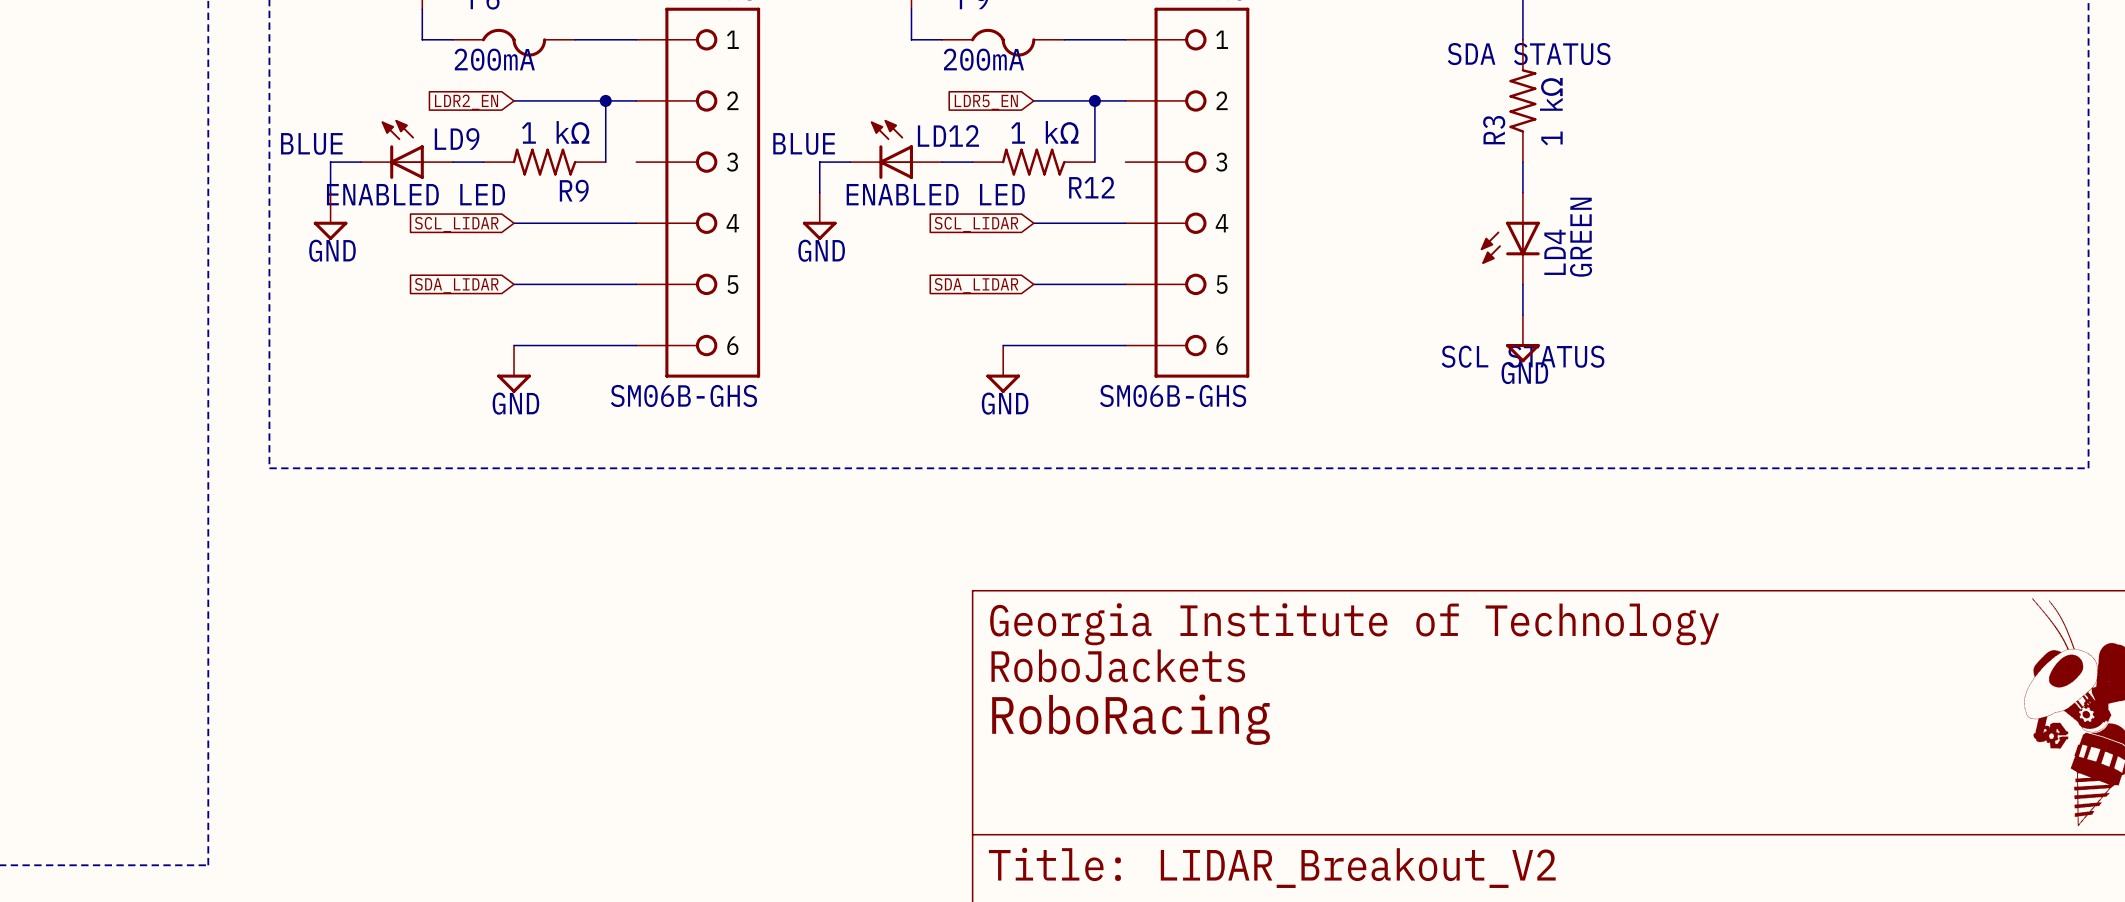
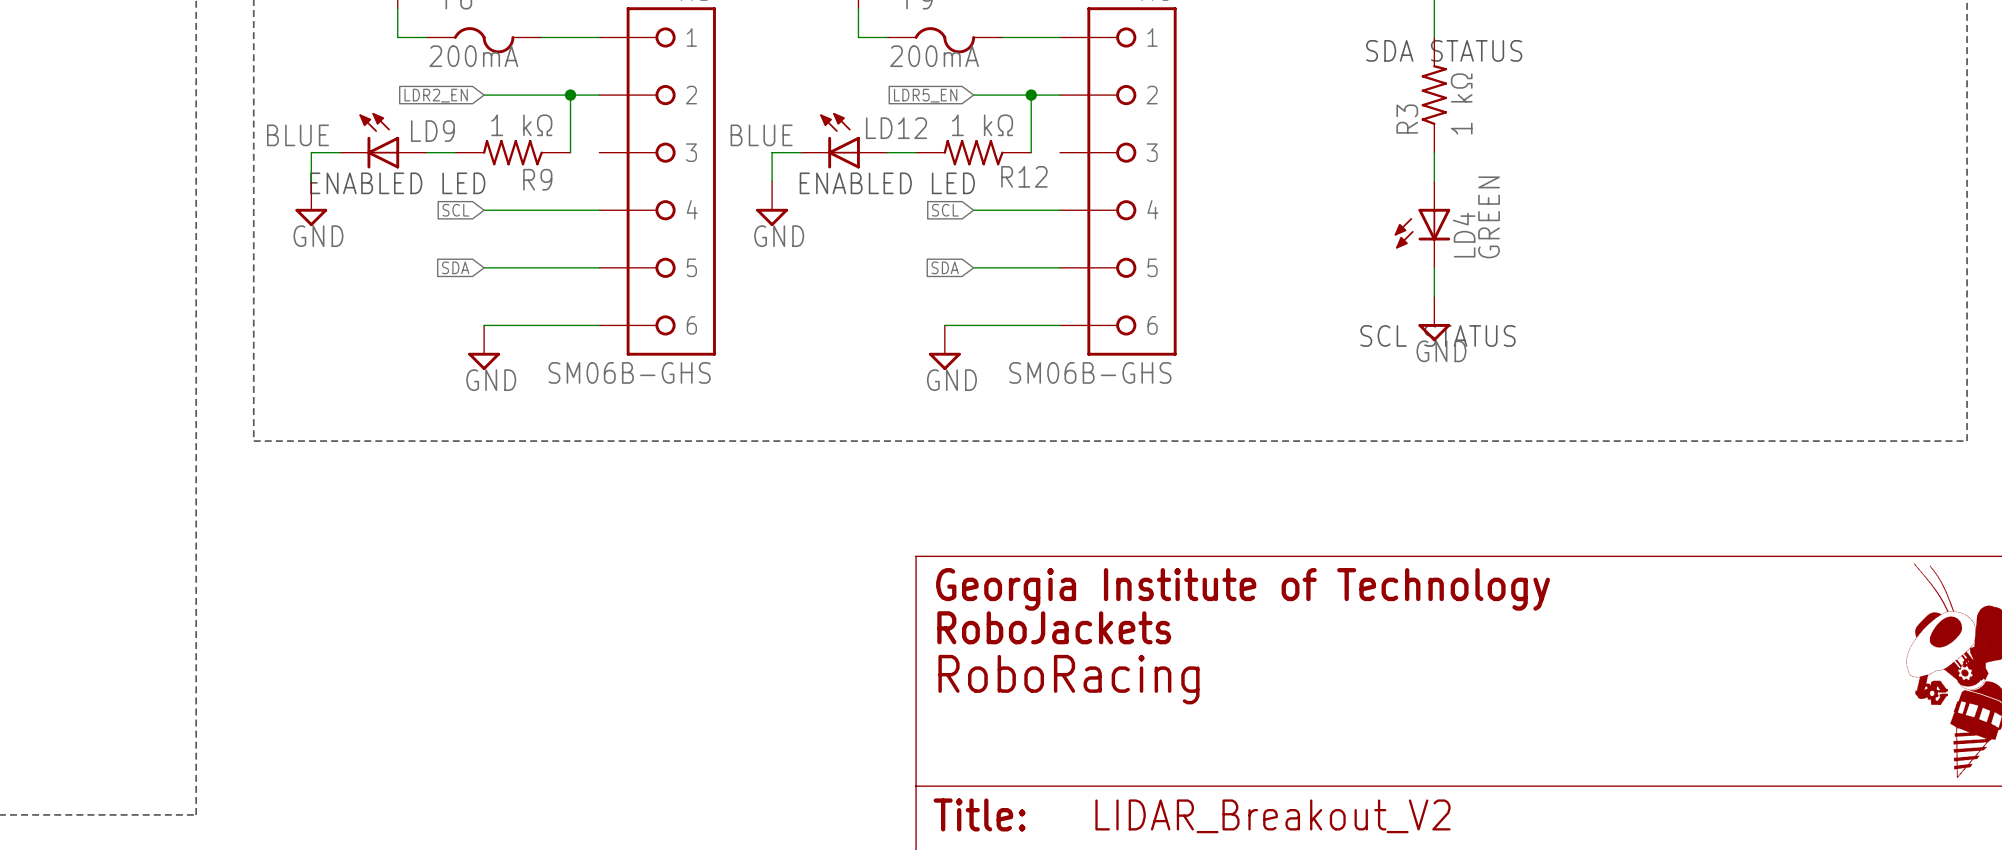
global label: SCL_LIDAR (456, 224) -> SCL (455, 210)
global label: SCL_LIDAR (976, 224) -> SCL (945, 210)
global label: SDA_LIDAR (456, 285) -> SDA (455, 267)
global label: SDA_LIDAR (976, 285) -> SDA (945, 267)

